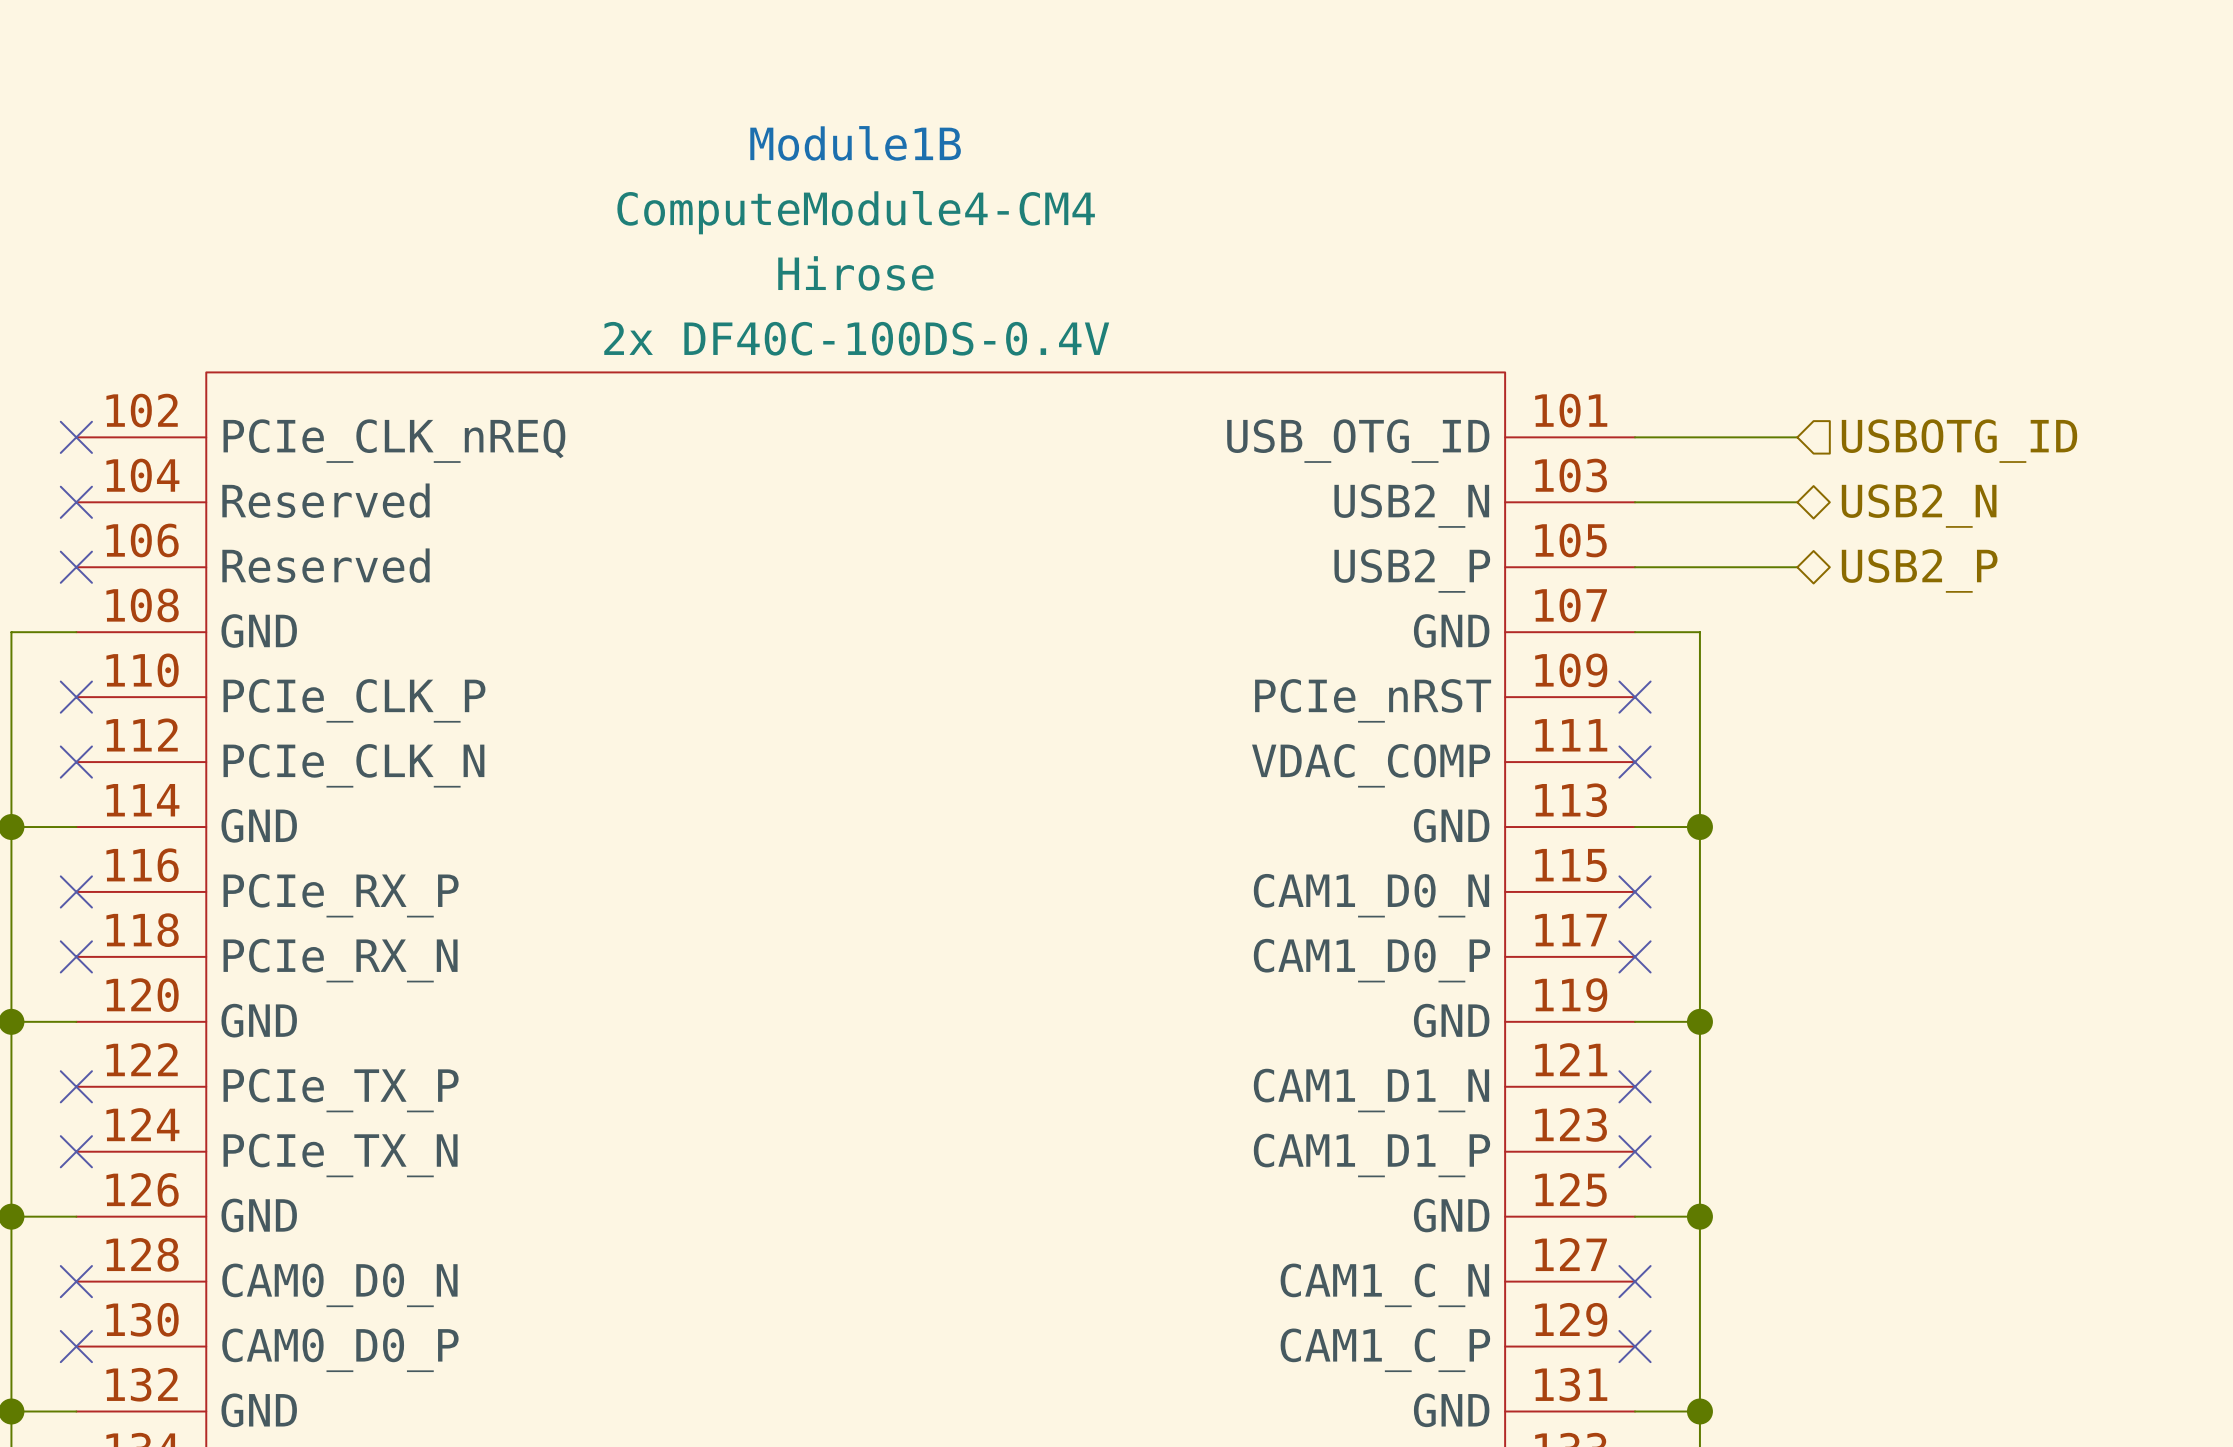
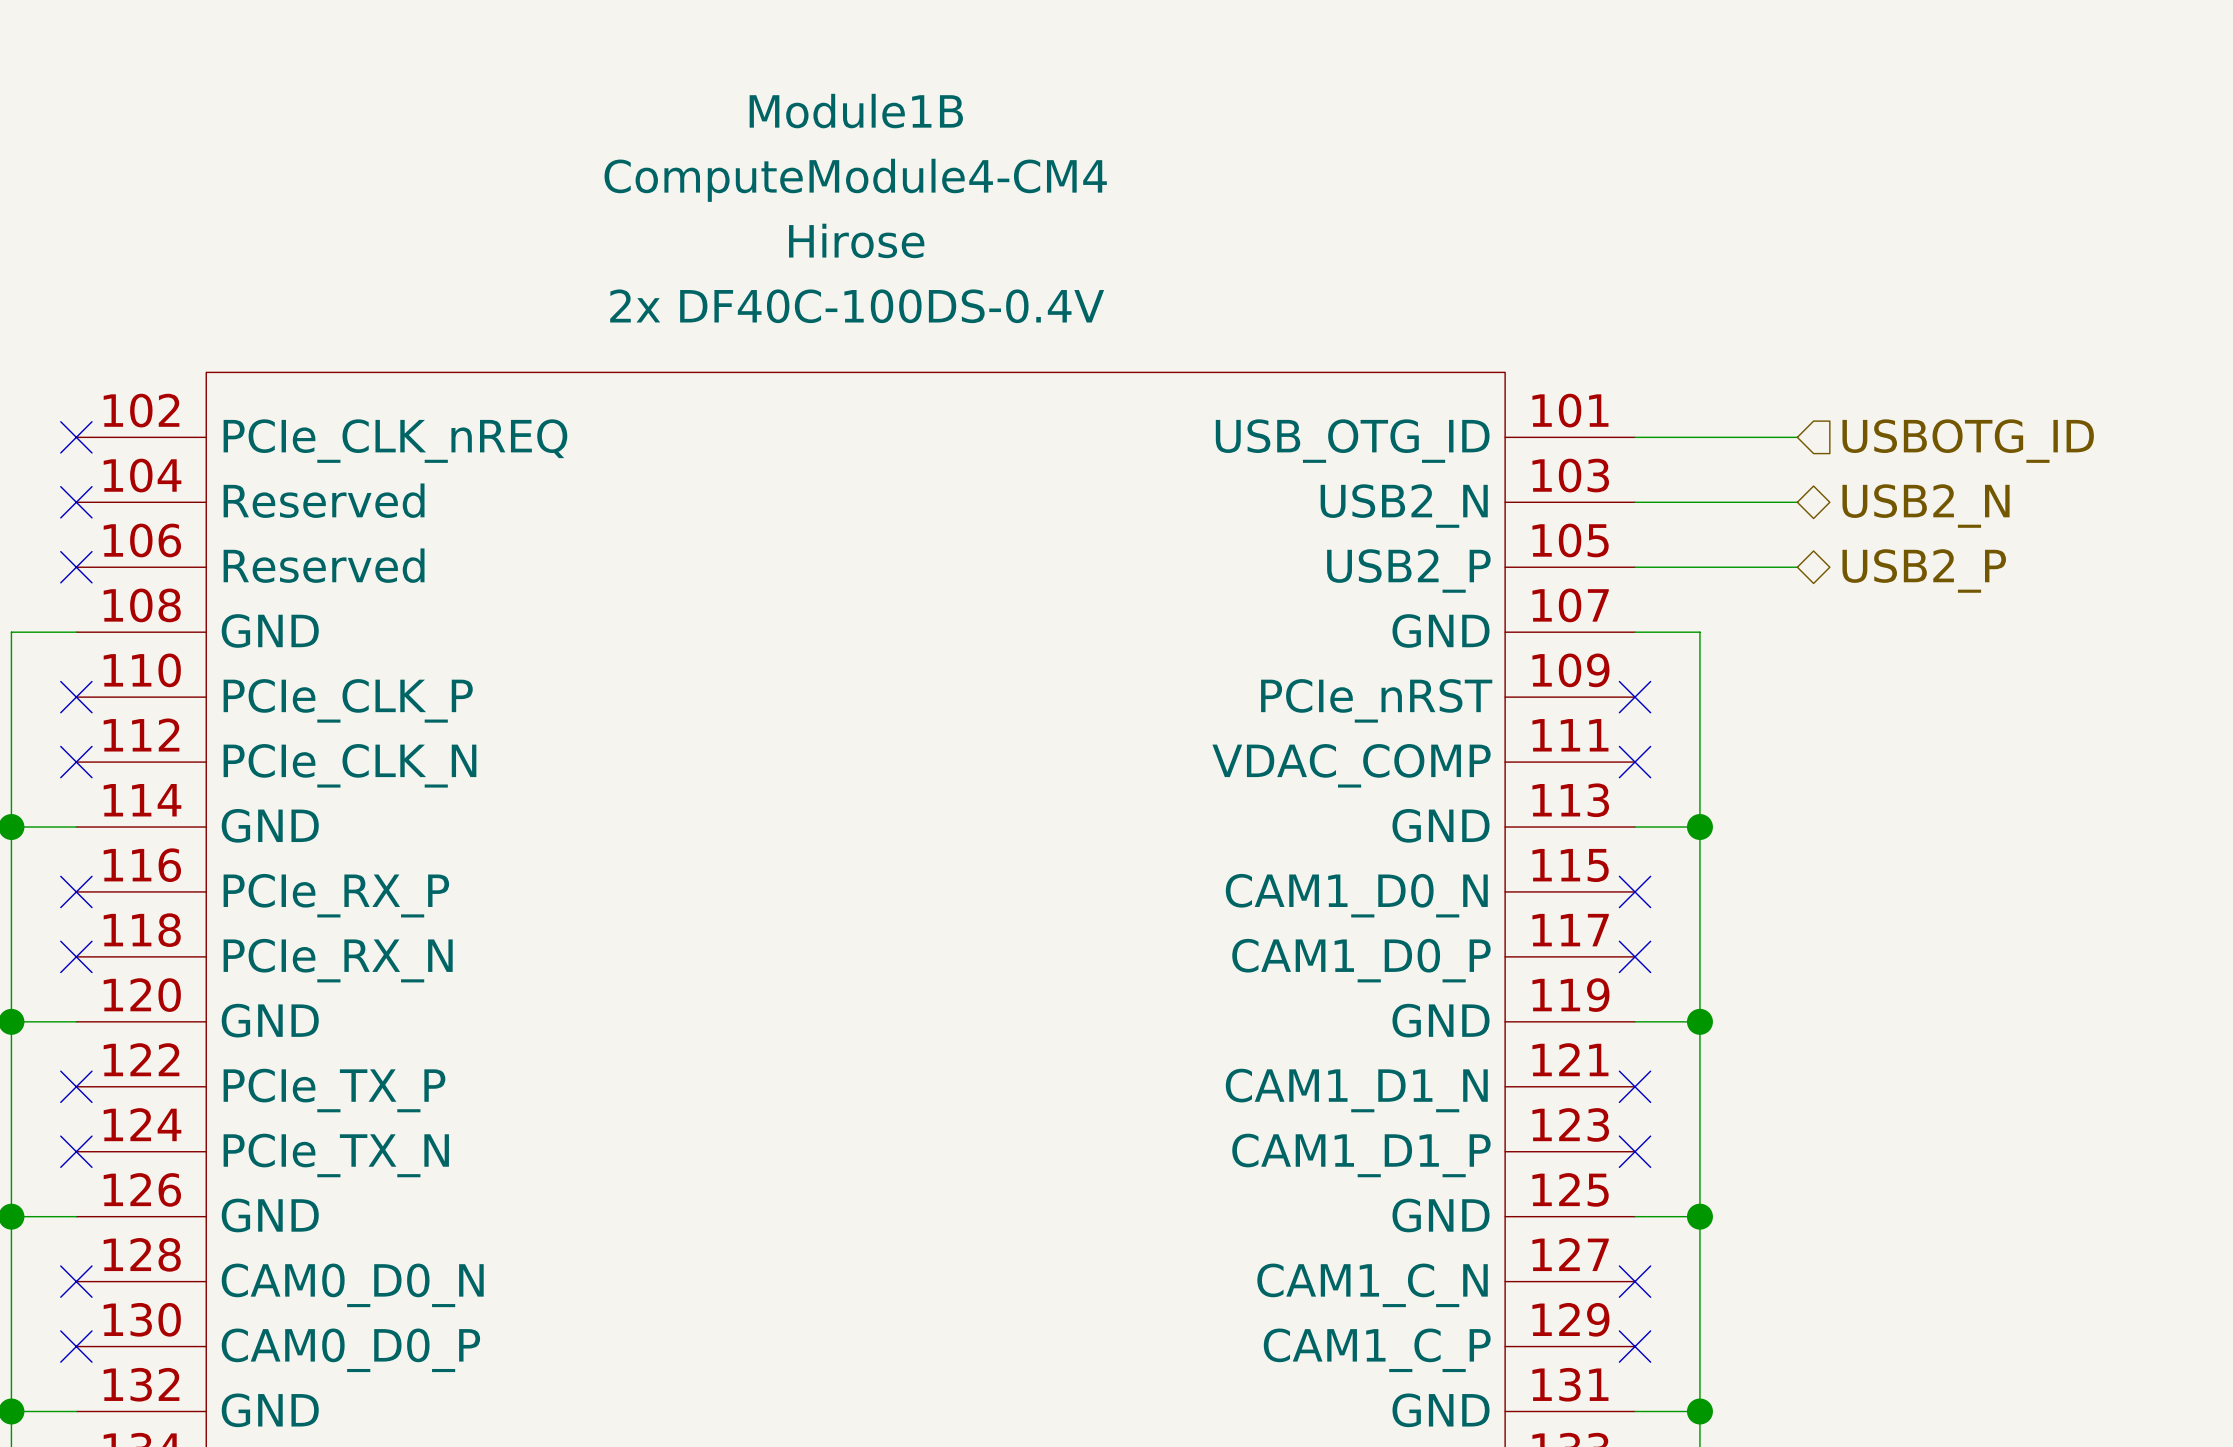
Module1B name position: Module1B (855, 143) -> Module1B (856, 111)
Module1B value position: ComputeModule4-CM4 (856, 212) -> ComputeModule4-CM4 (855, 180)
Module1B text position: Hirose (855, 273) -> Hirose (856, 240)
Module1B text position: 2x DF40C-100DS-0.4V (856, 338) -> 2x DF40C-100DS-0.4V (857, 306)

